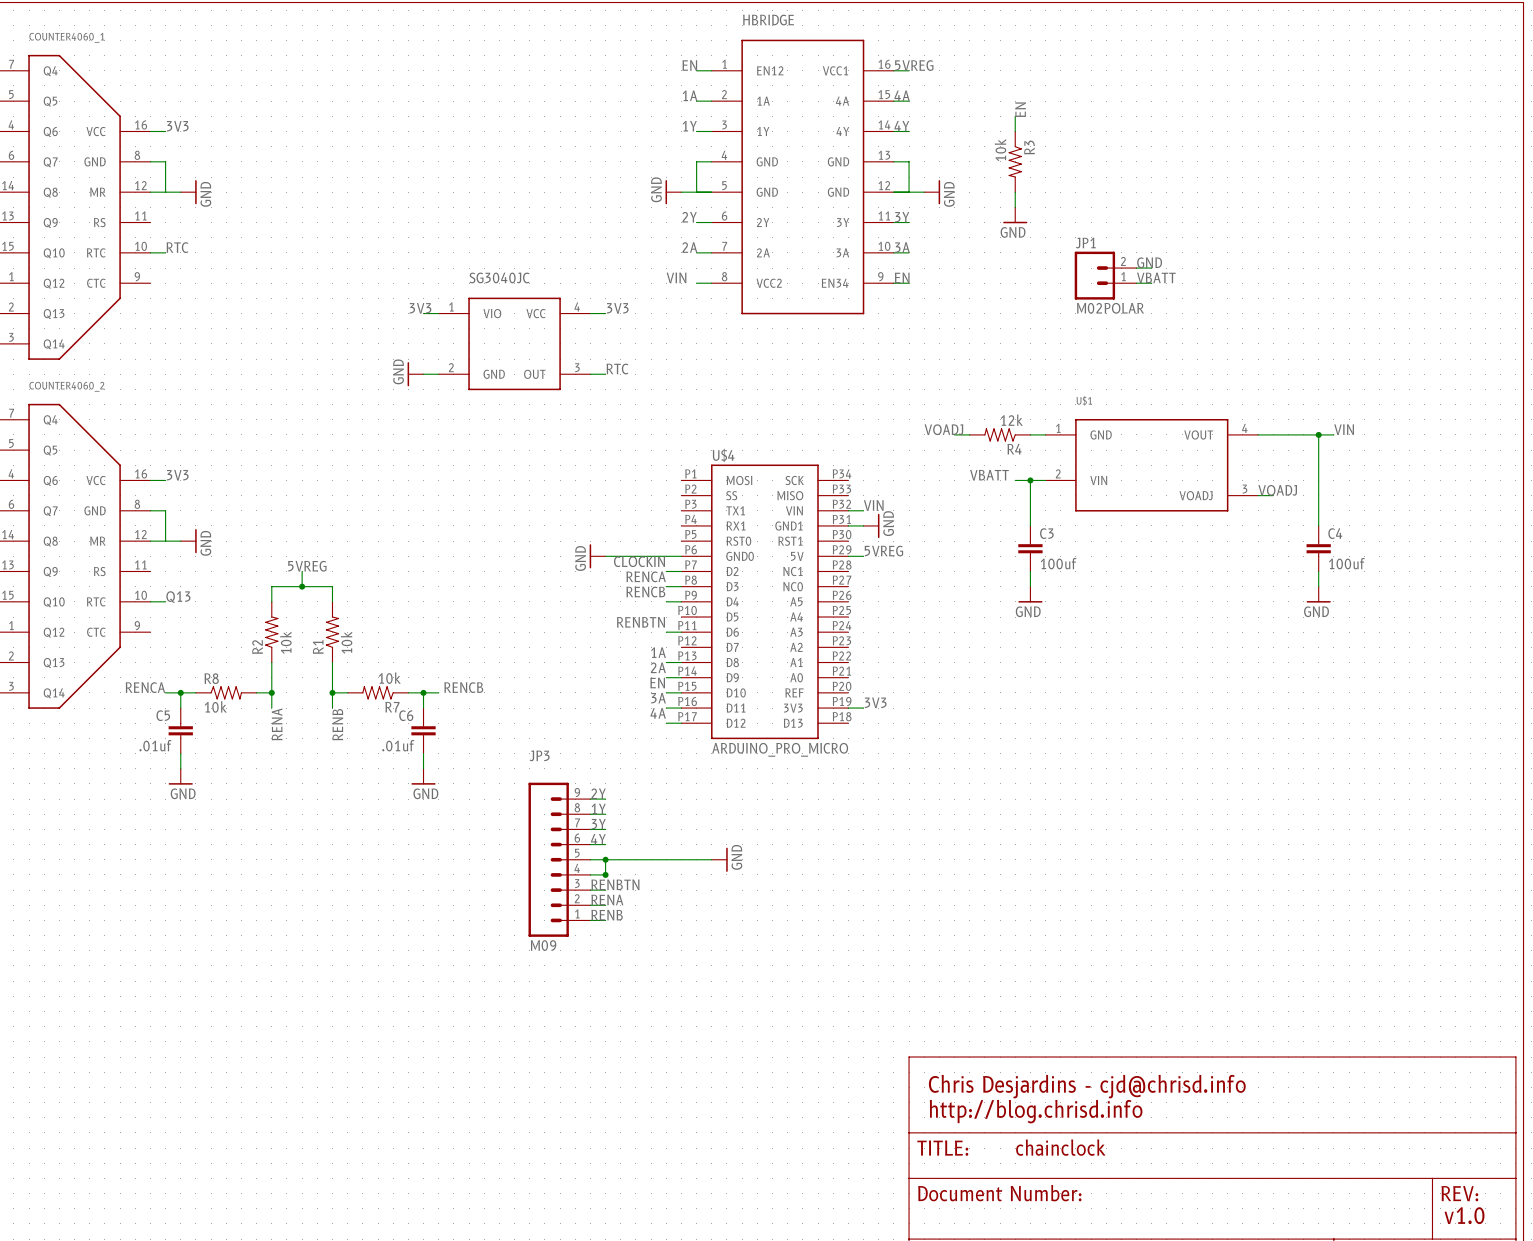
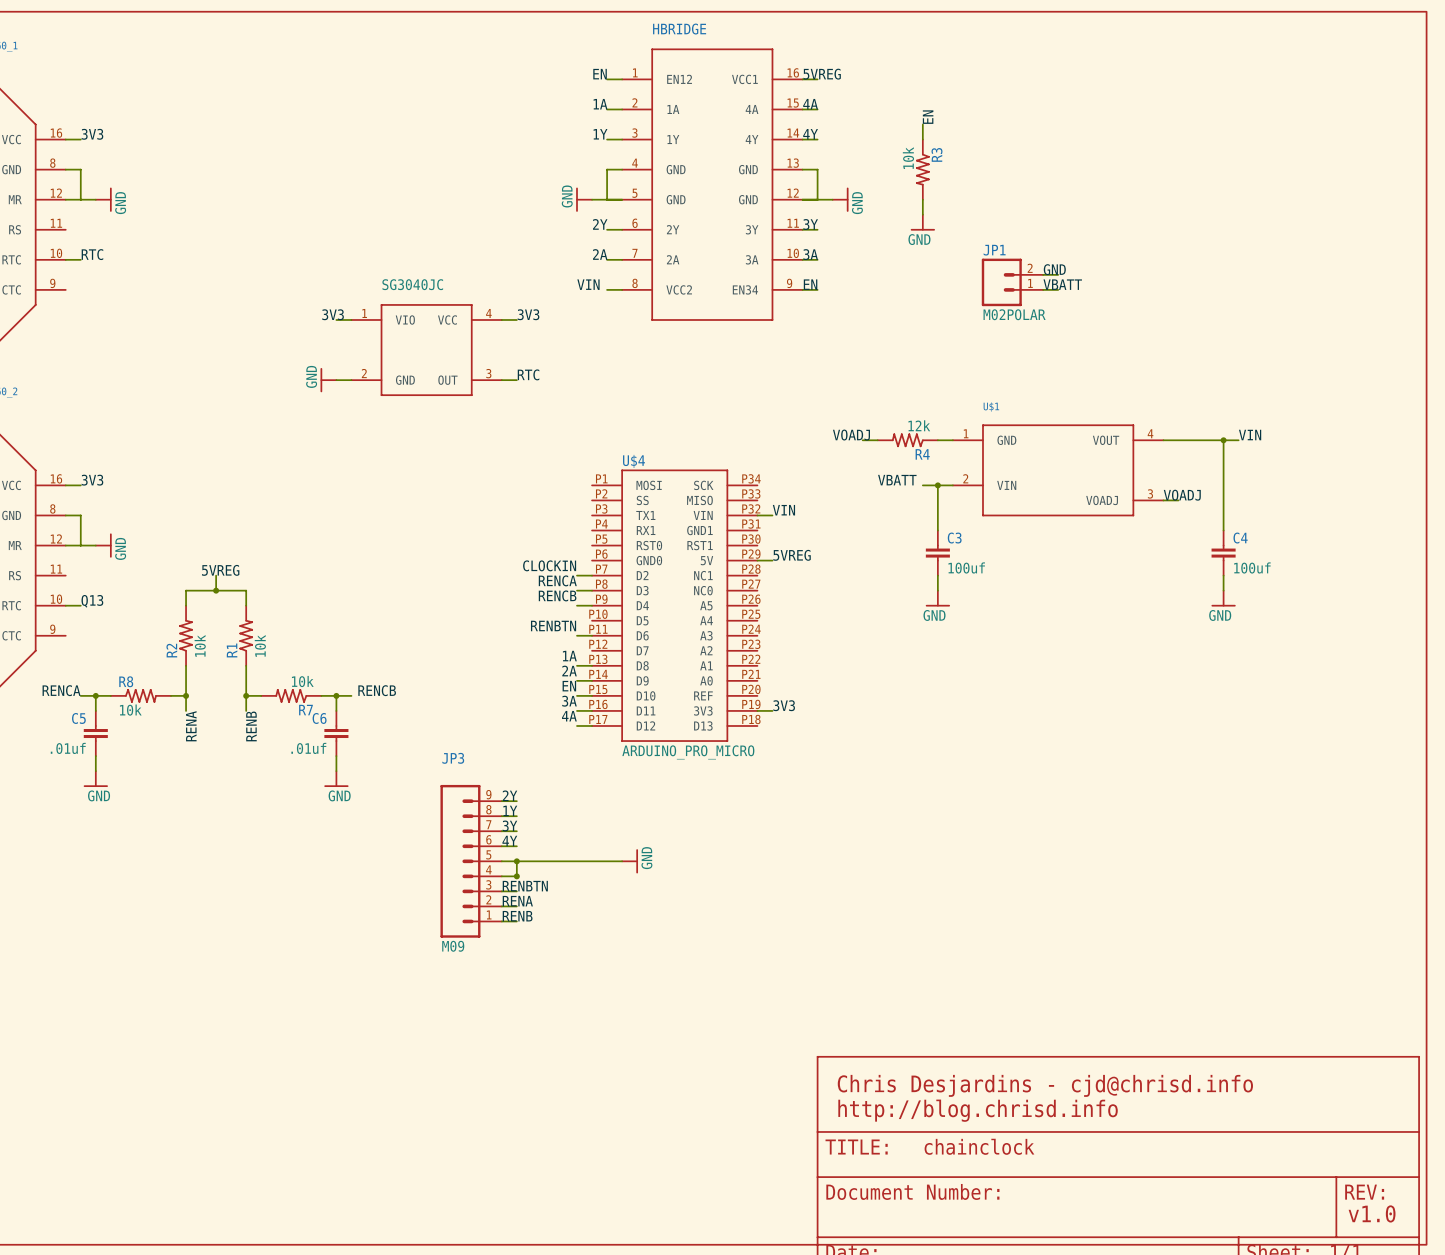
wire: (848, 525) (863, 525) -> none
power symbol: GND (871, 525) -> none
power symbol: GND (597, 556) -> none
wire: (605, 556) (681, 556) -> none

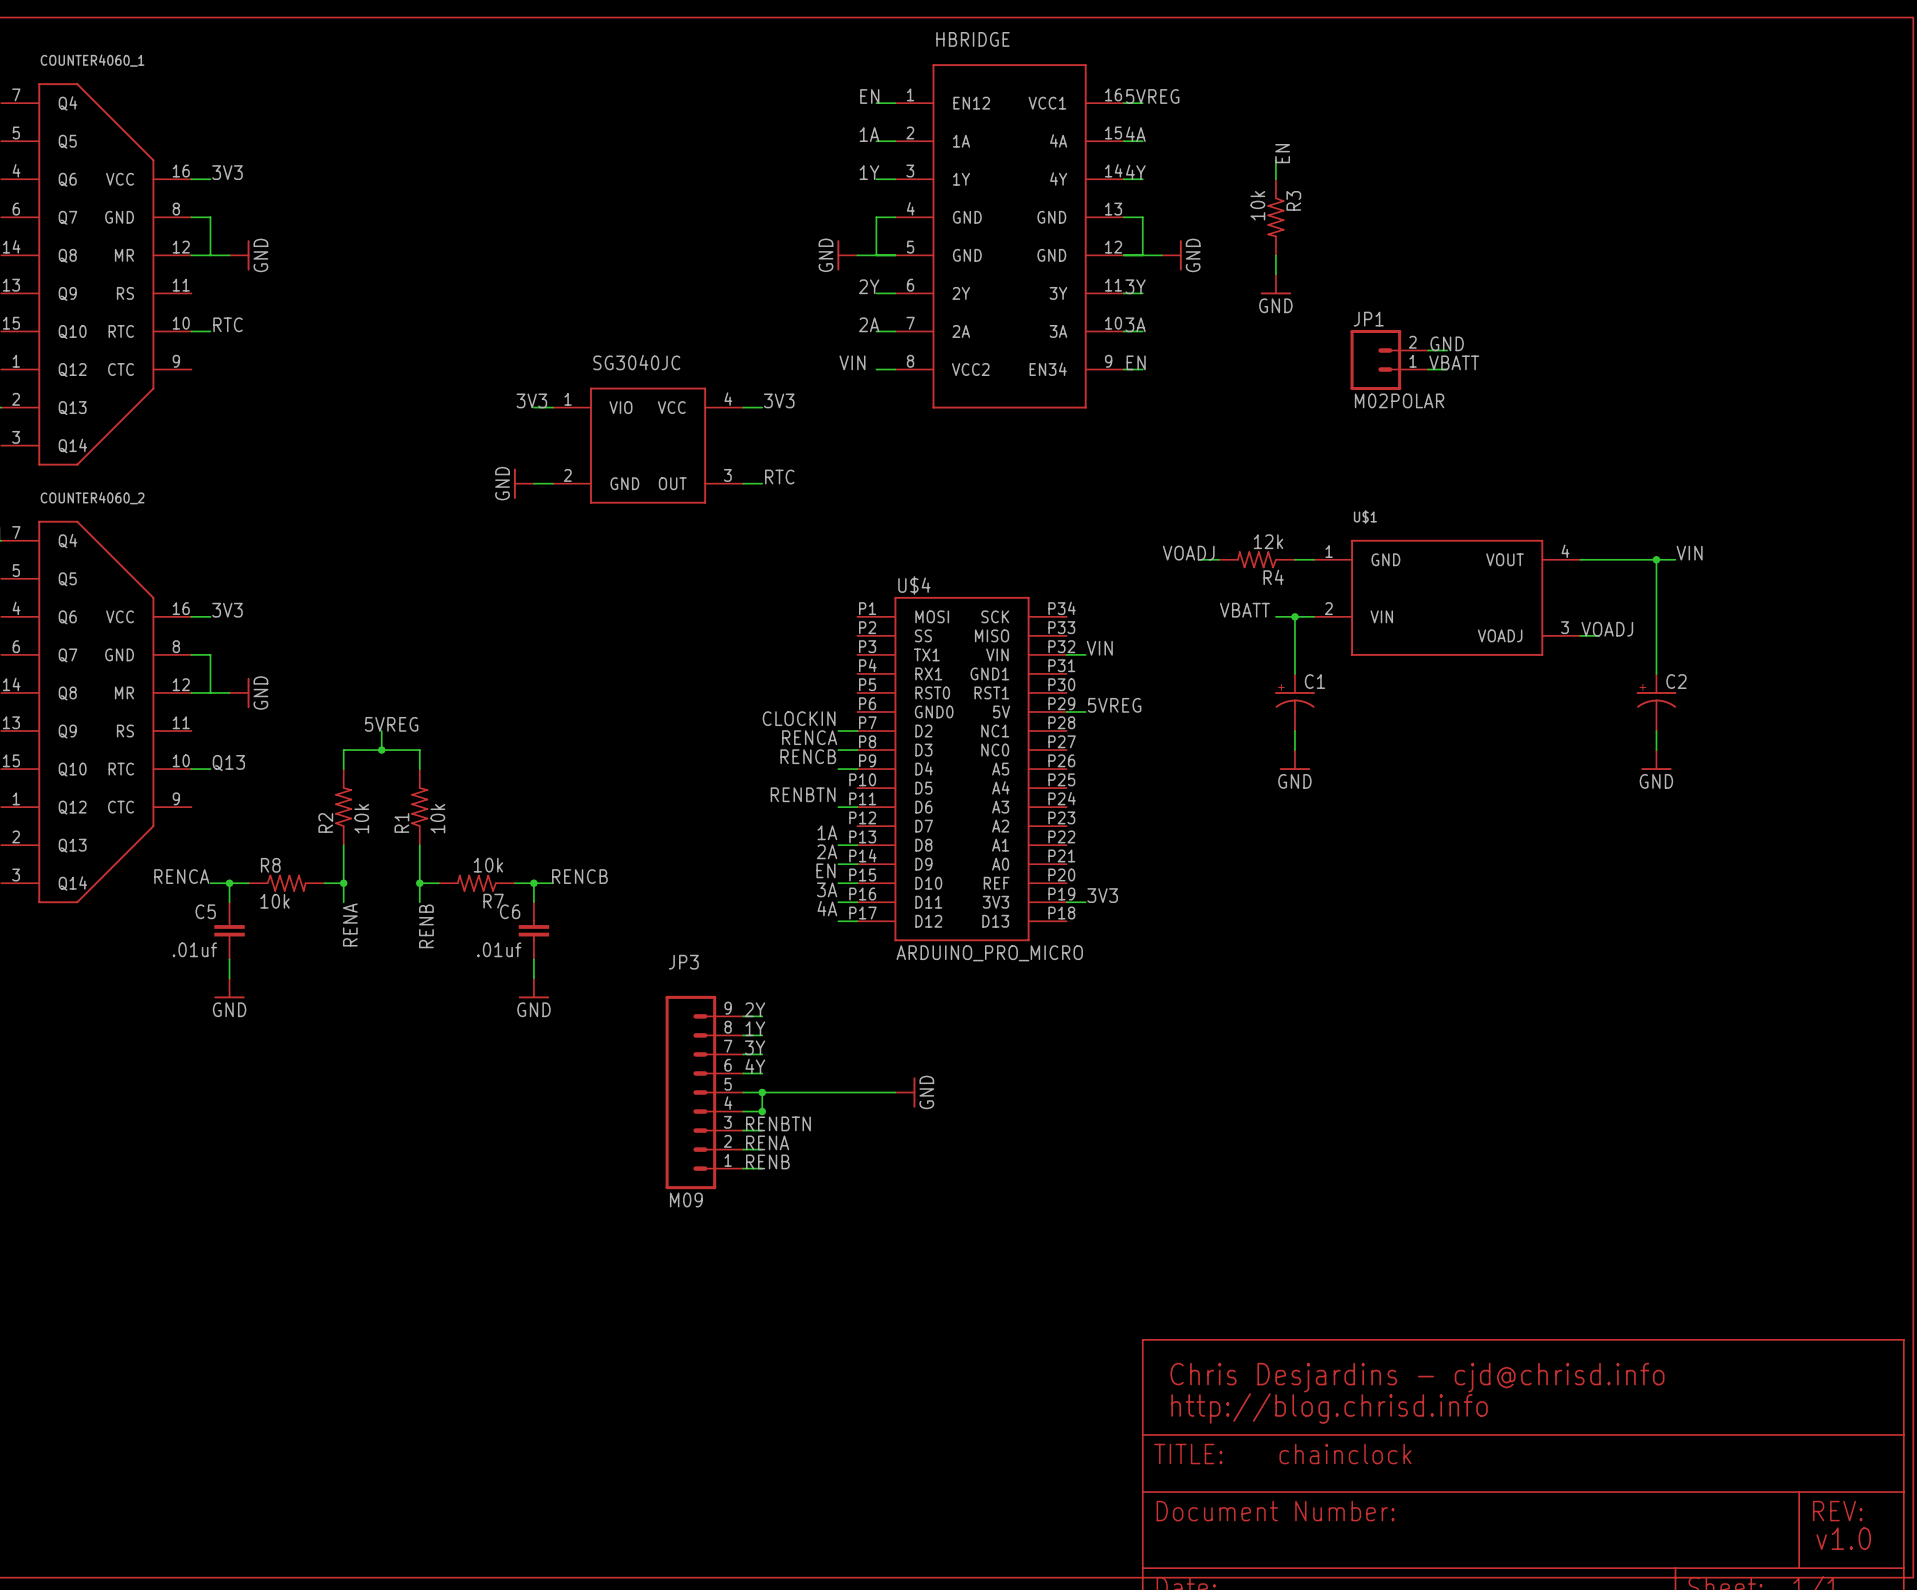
C3: 100uf (937, 553) -> none
C1: none -> (1294, 702)
C4: 100uf (1223, 553) -> none
C2: none -> (1656, 702)

